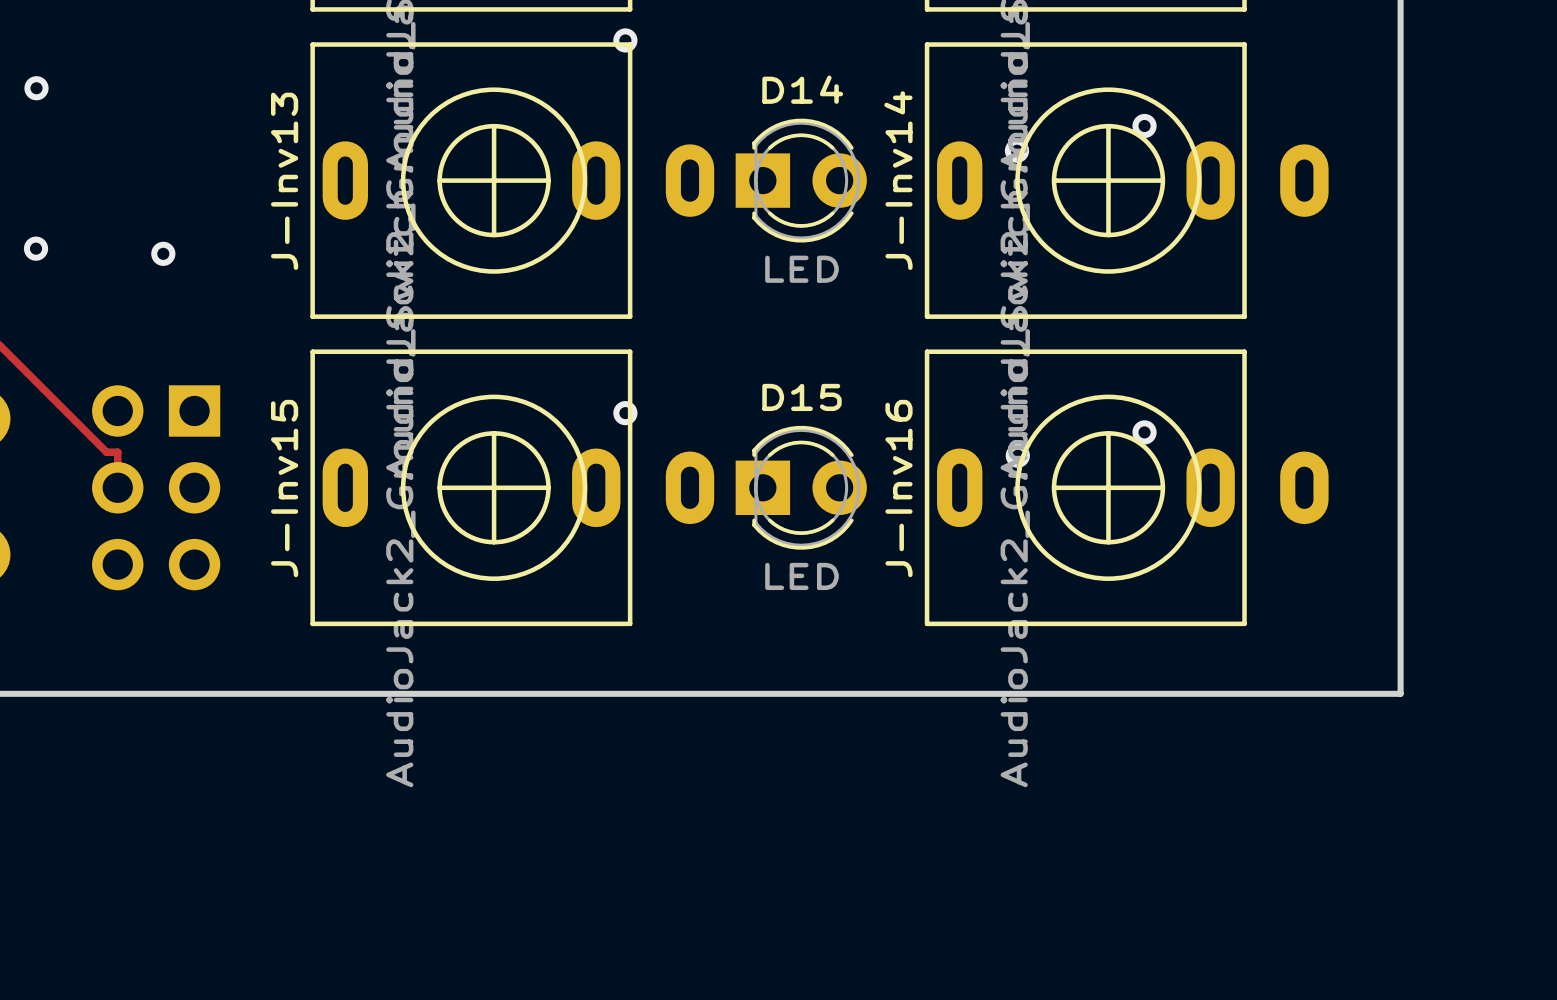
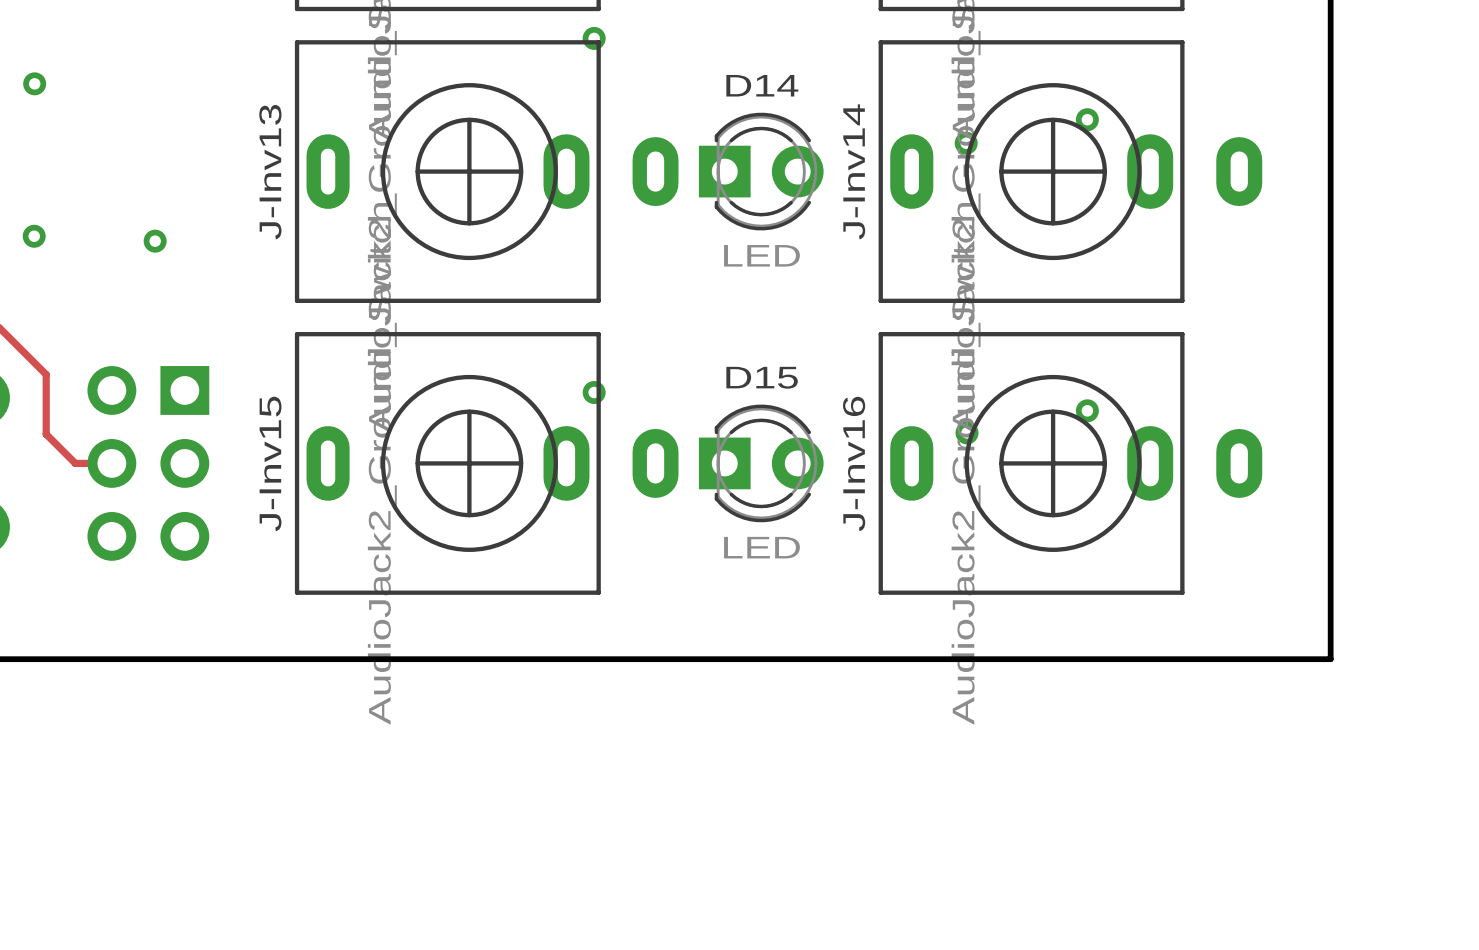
track: (48, 394) (106, 452) (117, 452) (117, 487) -> (46, 374) (46, 434) (75, 463) (111, 463)

